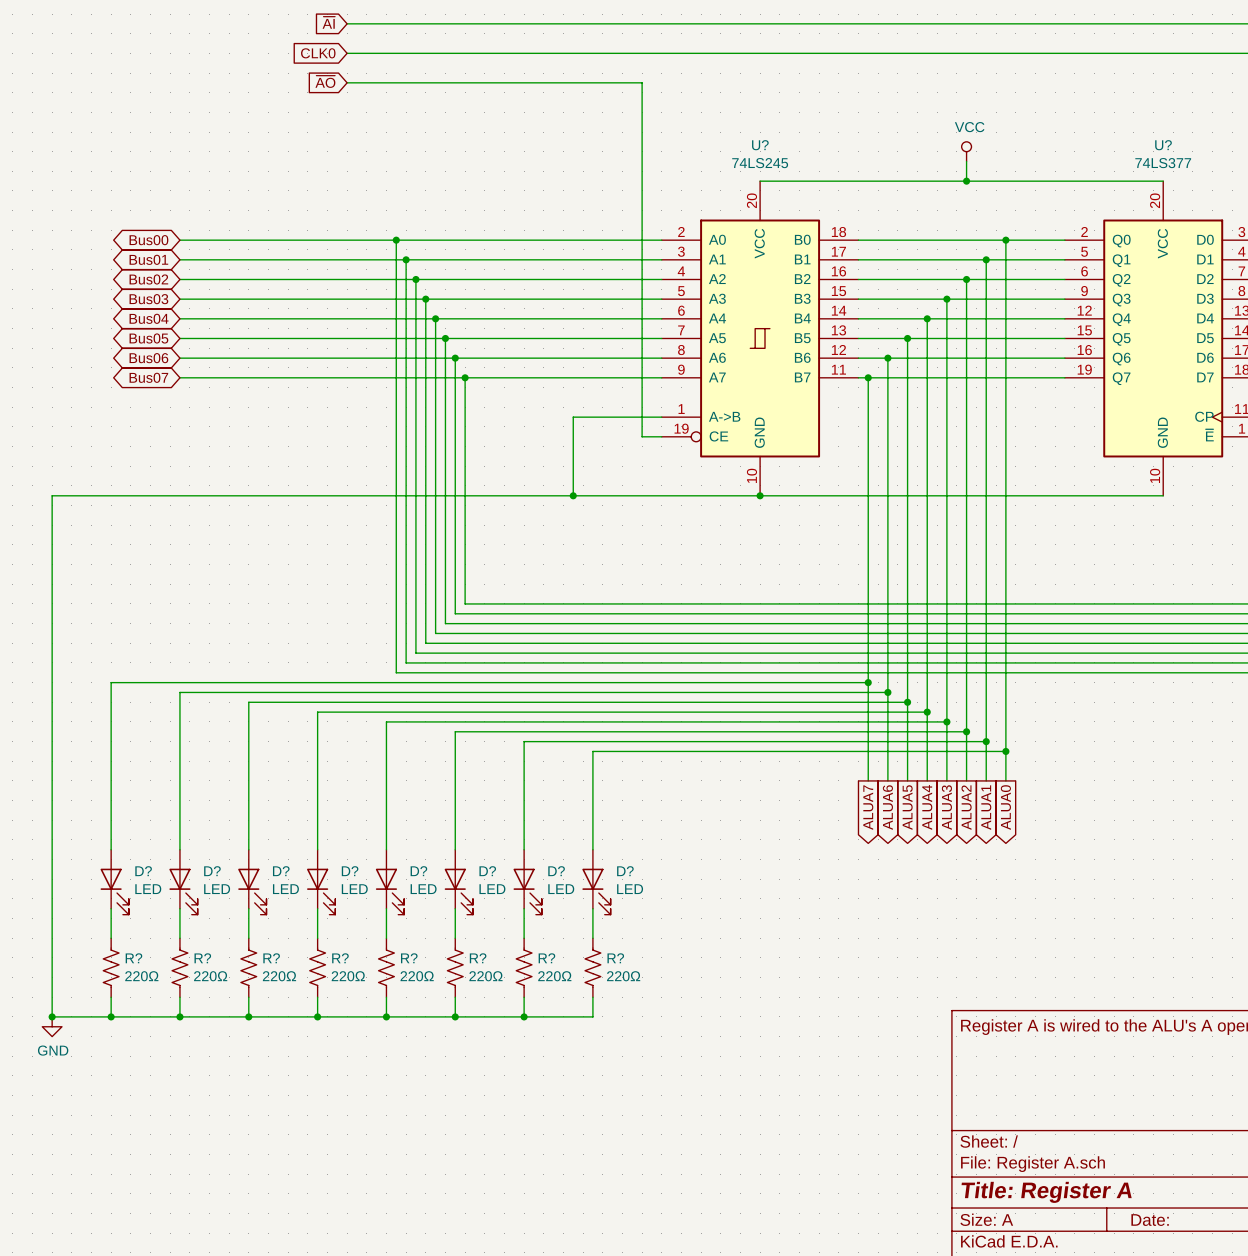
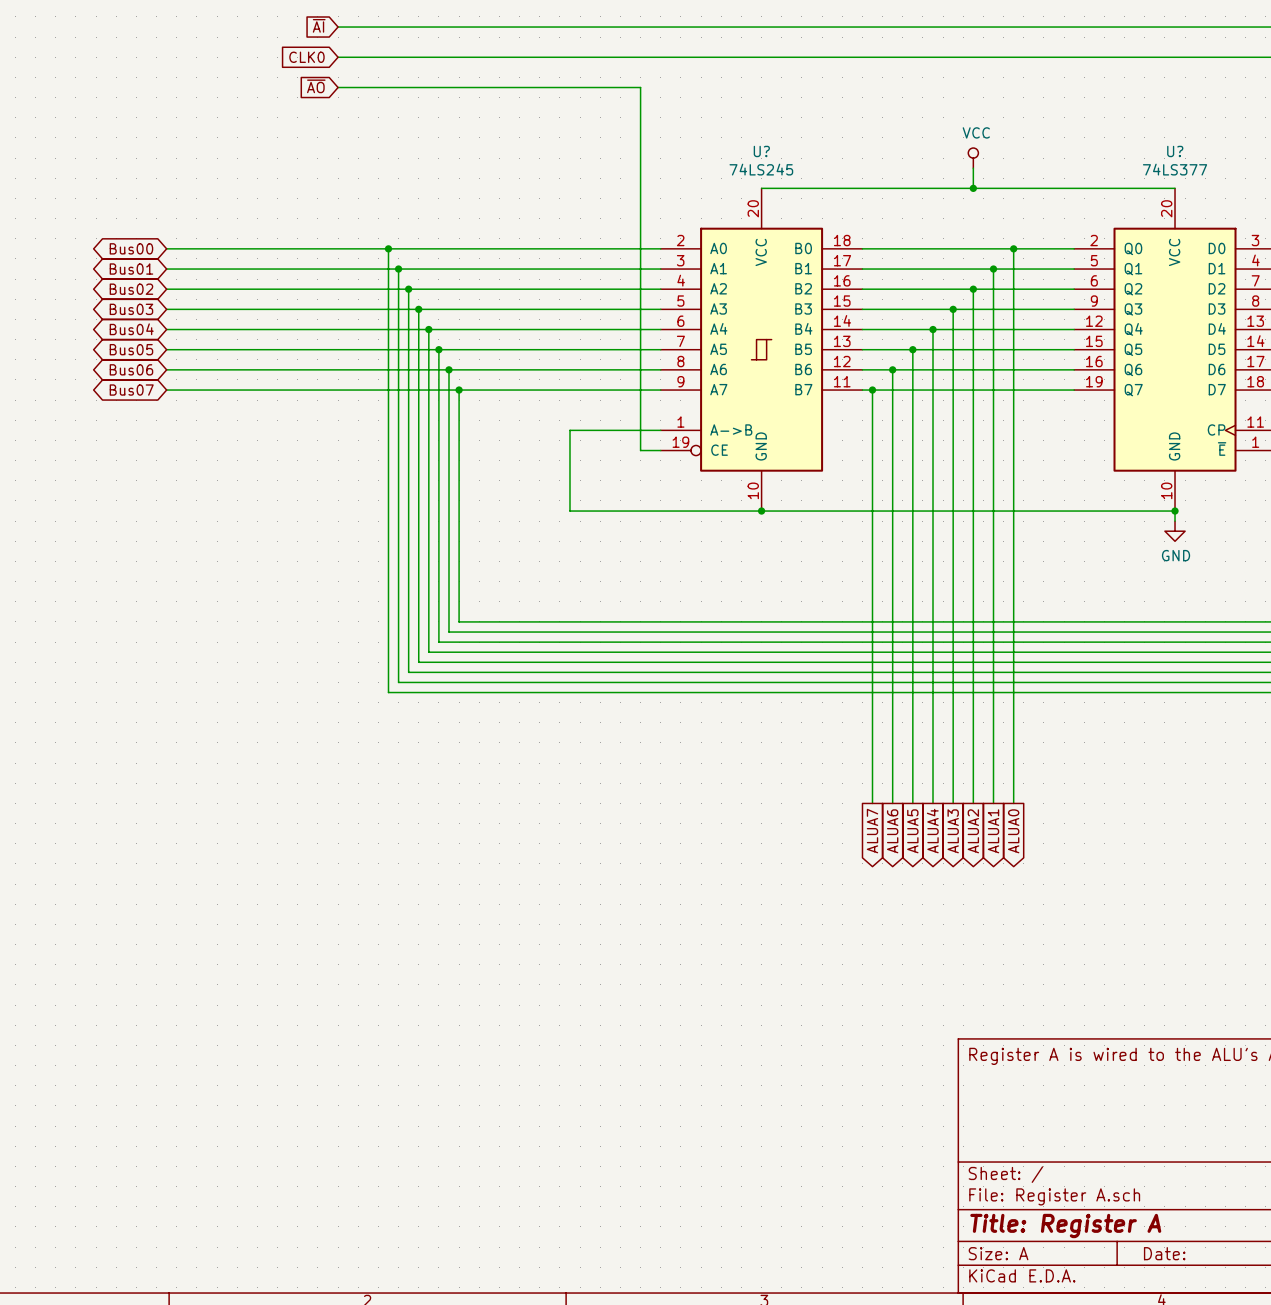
wire: (573, 495) (52, 495) (52, 1016) (592, 1016) (592, 997) -> none
junction: (573, 495) -> none
wire: none -> (1175, 511) (1175, 521)
junction: none -> (1175, 511)
power symbol: none -> GND (1175, 531)
wire: (868, 682) (111, 682) (111, 849) -> none
junction: (868, 682) -> none
wire: (887, 692) (179, 692) (179, 849) -> none
junction: (887, 692) -> none
wire: (907, 702) (248, 702) (248, 849) -> none
junction: (907, 702) -> none
wire: (927, 712) (317, 712) (317, 849) -> none
junction: (927, 712) -> none
wire: (946, 721) (386, 721) (386, 849) -> none
junction: (946, 721) -> none
wire: (966, 731) (455, 731) (455, 849) -> none
junction: (966, 731) -> none
wire: (986, 741) (524, 741) (524, 849) -> none
junction: (986, 741) -> none
wire: (1005, 751) (592, 751) (592, 849) -> none
junction: (1005, 751) -> none
D?: LED (114, 882) -> none
D?: LED (183, 882) -> none
D?: LED (252, 882) -> none
D?: LED (321, 882) -> none
D?: LED (389, 882) -> none
D?: LED (458, 882) -> none
D?: LED (527, 882) -> none
D?: LED (596, 882) -> none
wire: (111, 908) (111, 938) -> none
wire: (179, 908) (179, 938) -> none
wire: (248, 908) (248, 938) -> none
wire: (317, 908) (317, 938) -> none
wire: (386, 908) (386, 938) -> none
wire: (455, 908) (455, 938) -> none
wire: (524, 908) (524, 938) -> none
wire: (592, 908) (592, 938) -> none
R?: 220Ω (111, 967) -> none
R?: 220Ω (179, 967) -> none
R?: 220Ω (248, 967) -> none
R?: 220Ω (317, 967) -> none
R?: 220Ω (386, 967) -> none
R?: 220Ω (455, 967) -> none
R?: 220Ω (524, 967) -> none
R?: 220Ω (592, 967) -> none
wire: (111, 997) (111, 1016) -> none
wire: (179, 997) (179, 1016) -> none
wire: (248, 997) (248, 1016) -> none
wire: (317, 997) (317, 1016) -> none
wire: (386, 997) (386, 1016) -> none
wire: (455, 997) (455, 1016) -> none
wire: (524, 997) (524, 1016) -> none
junction: (52, 1016) -> none
junction: (111, 1016) -> none
junction: (179, 1016) -> none
junction: (248, 1016) -> none
junction: (317, 1016) -> none
junction: (386, 1016) -> none
junction: (455, 1016) -> none
junction: (524, 1016) -> none
power symbol: GND (52, 1026) -> none

